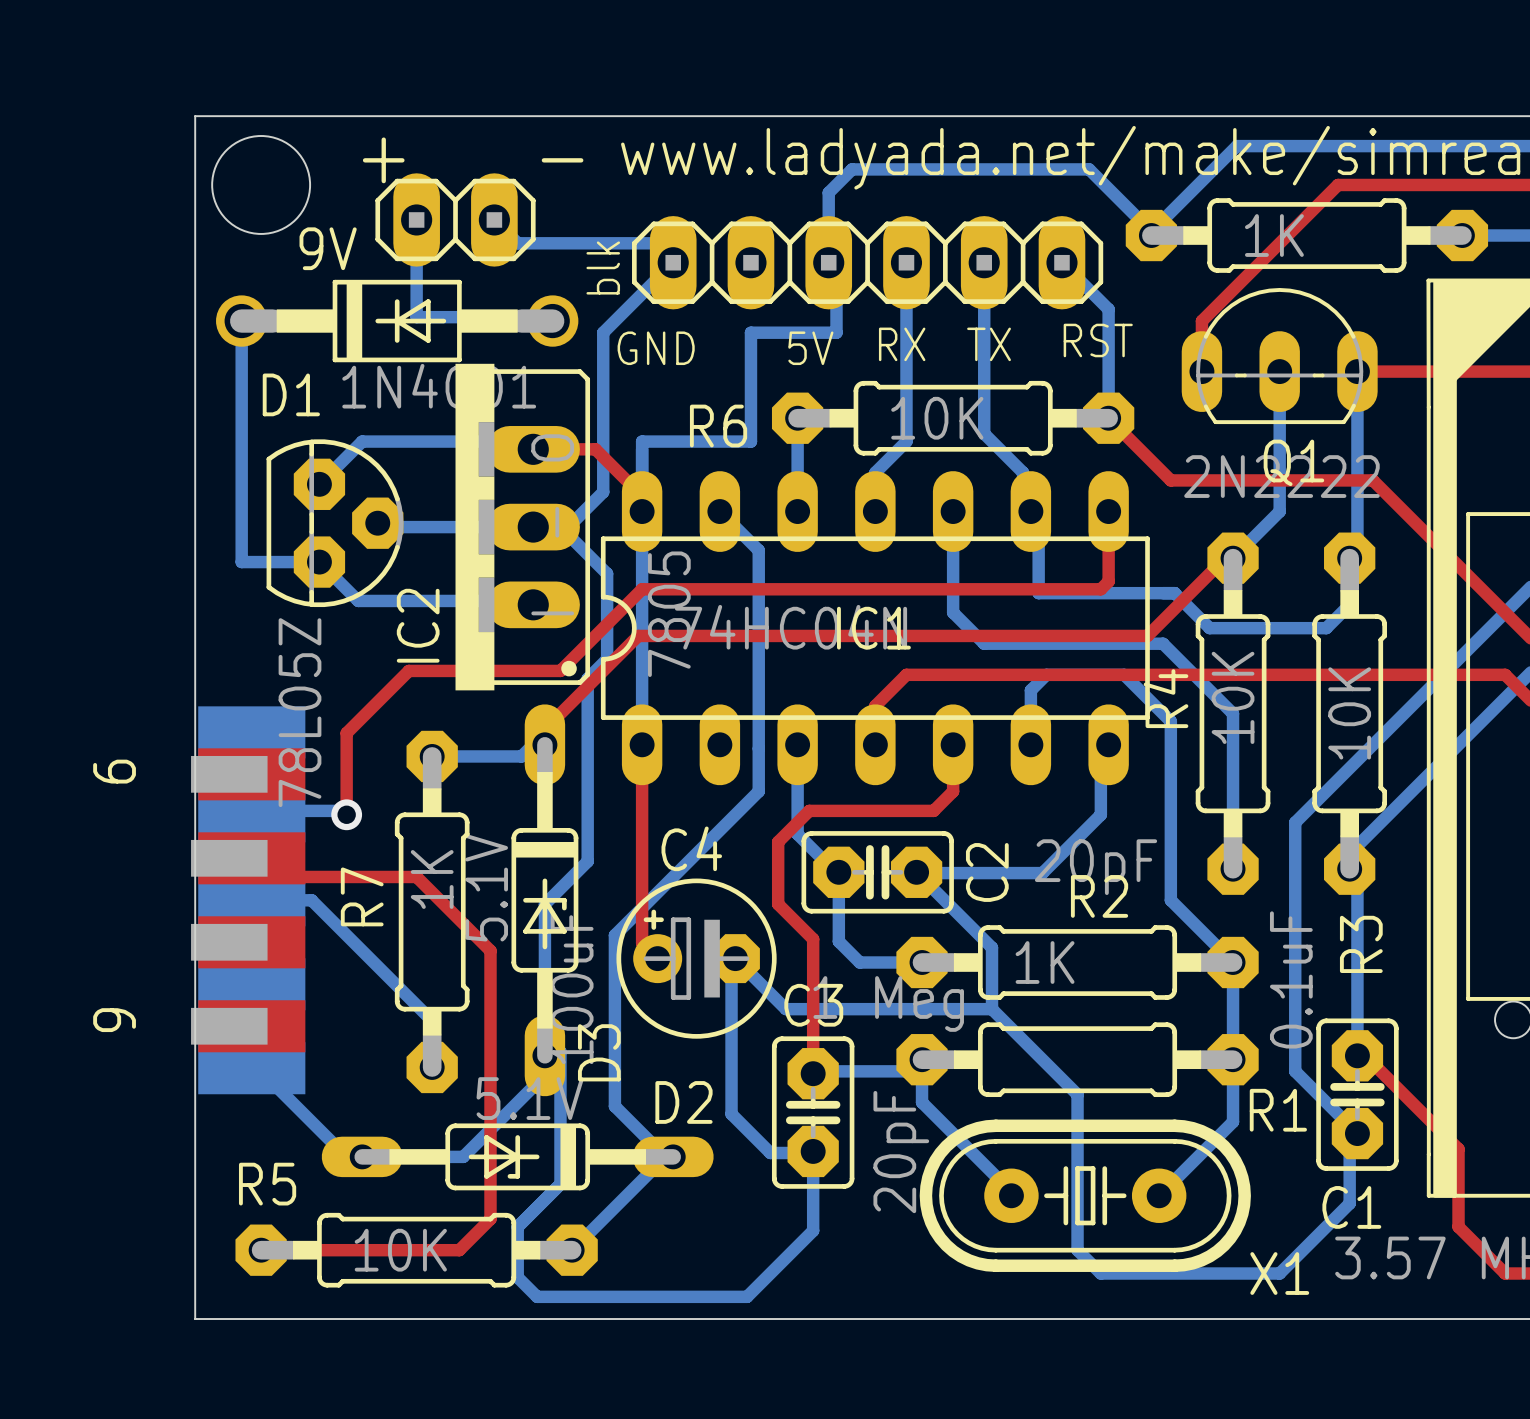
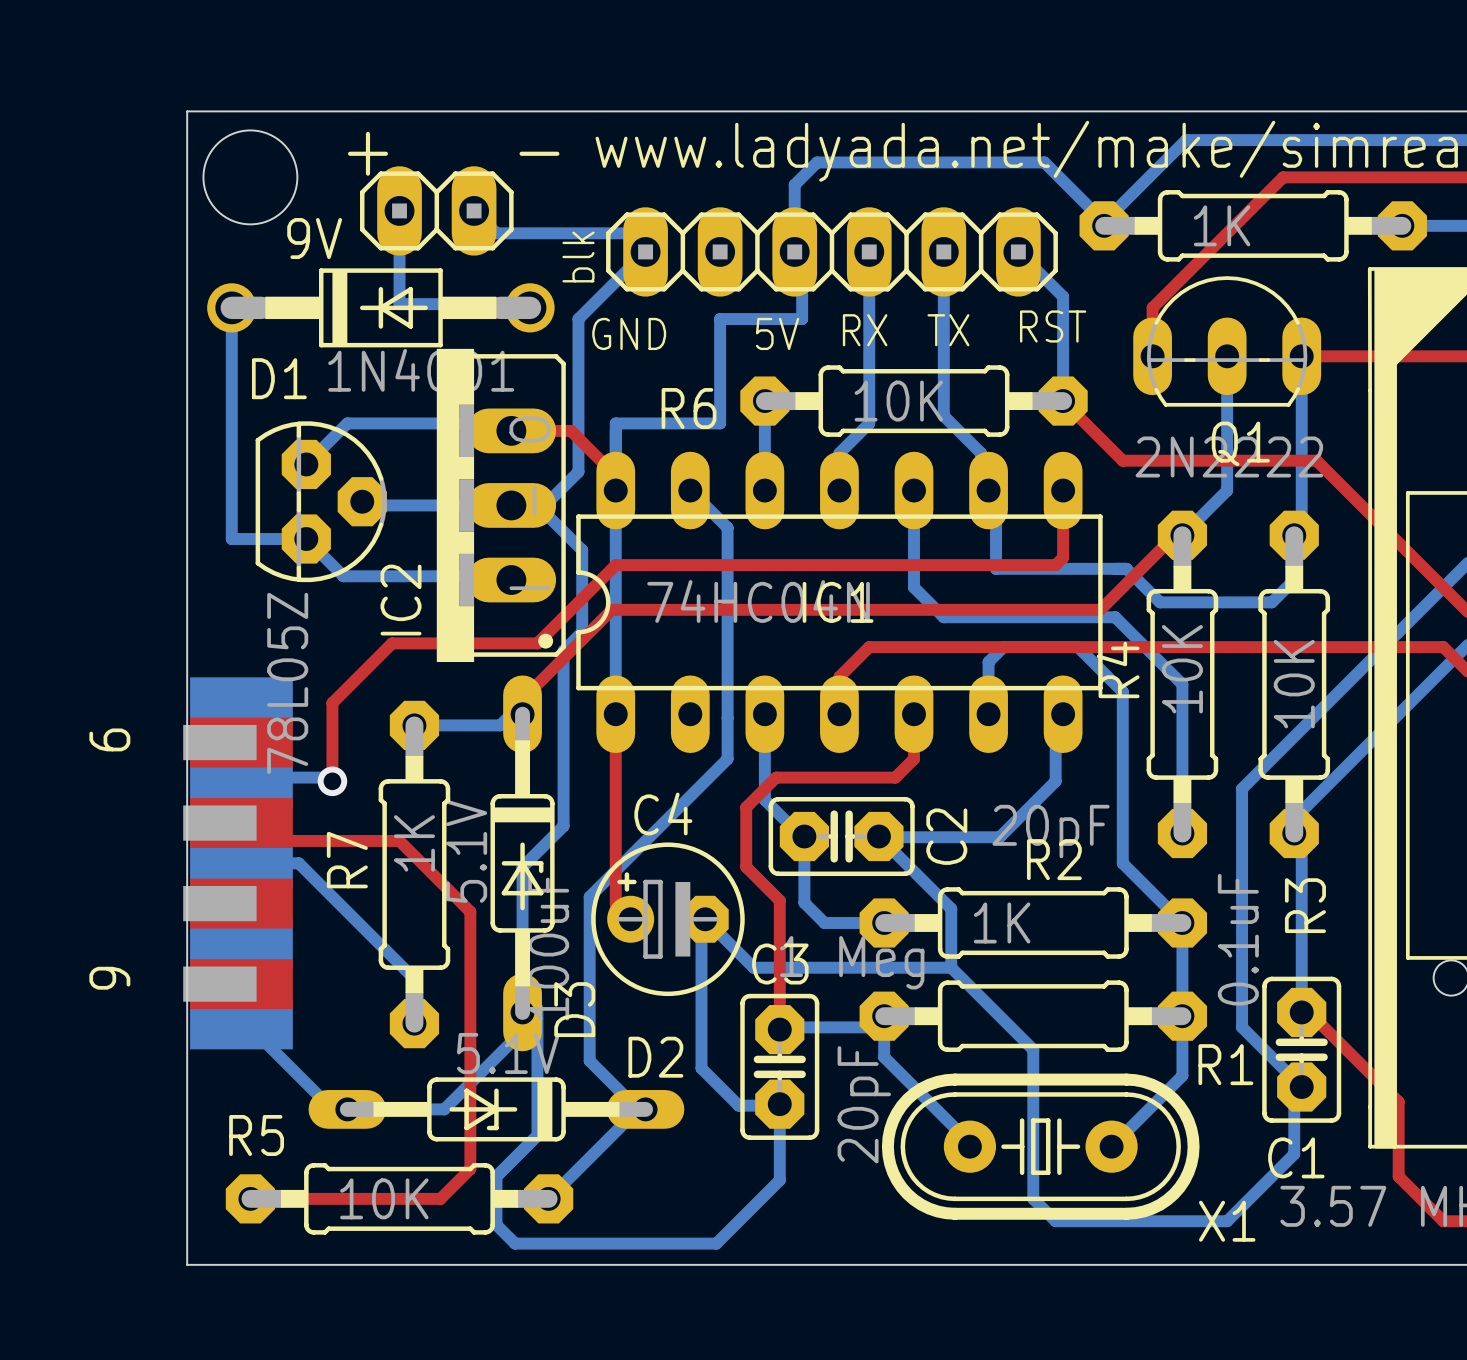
IC2 value: 7805 (669, 614) -> none

